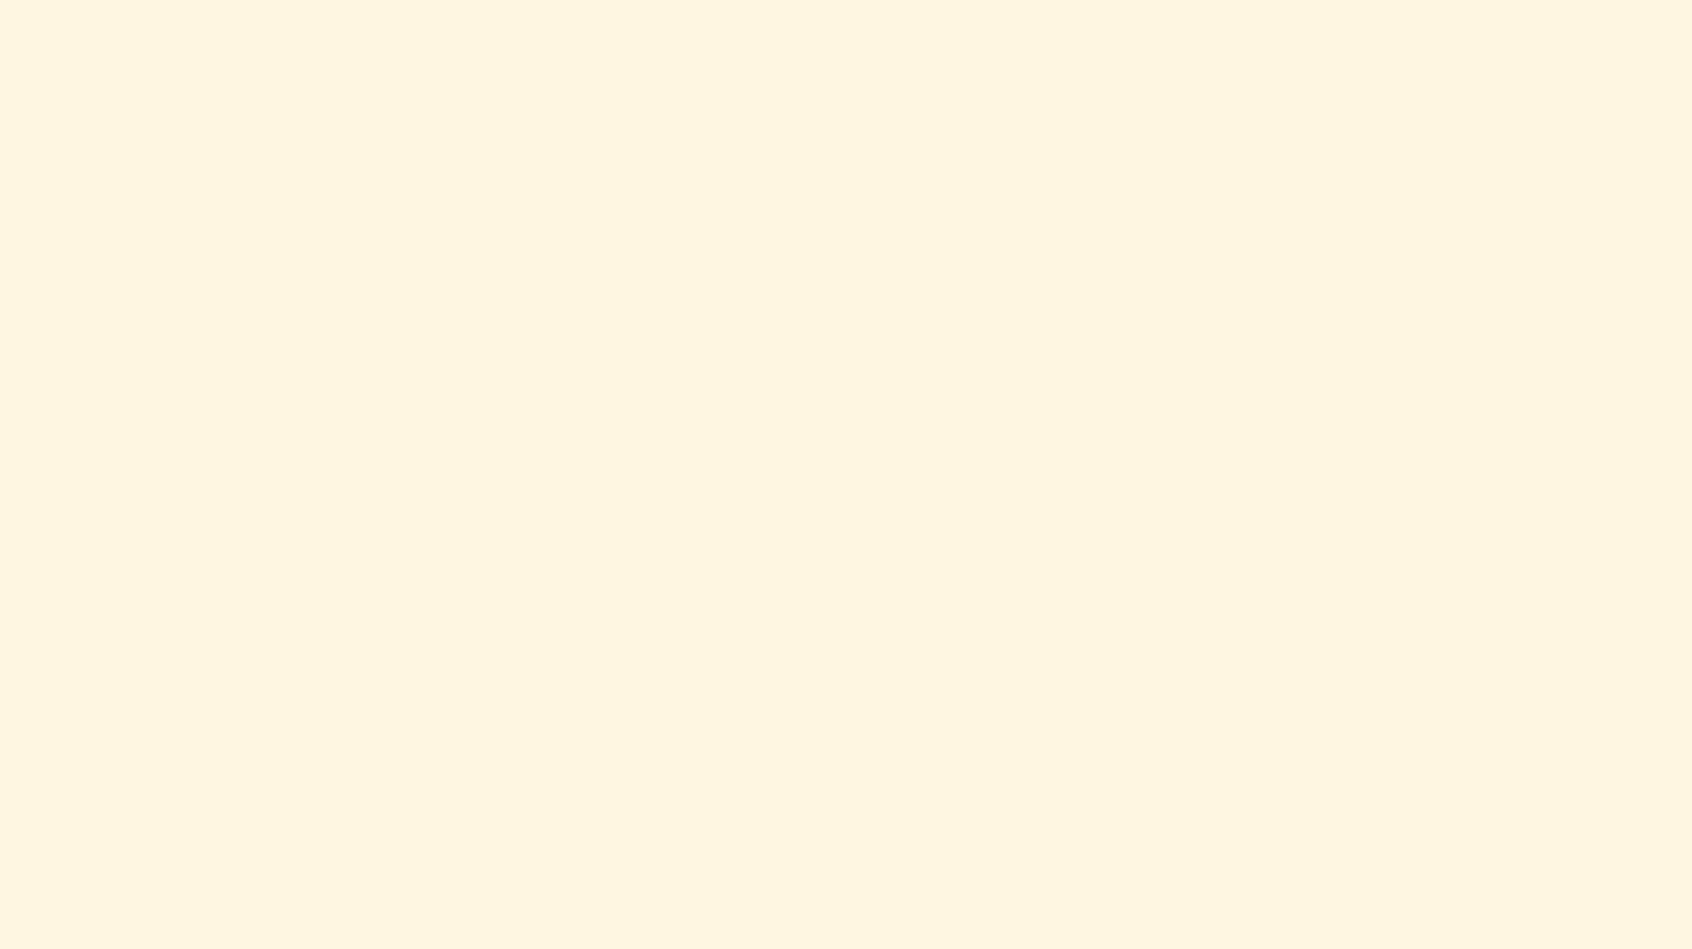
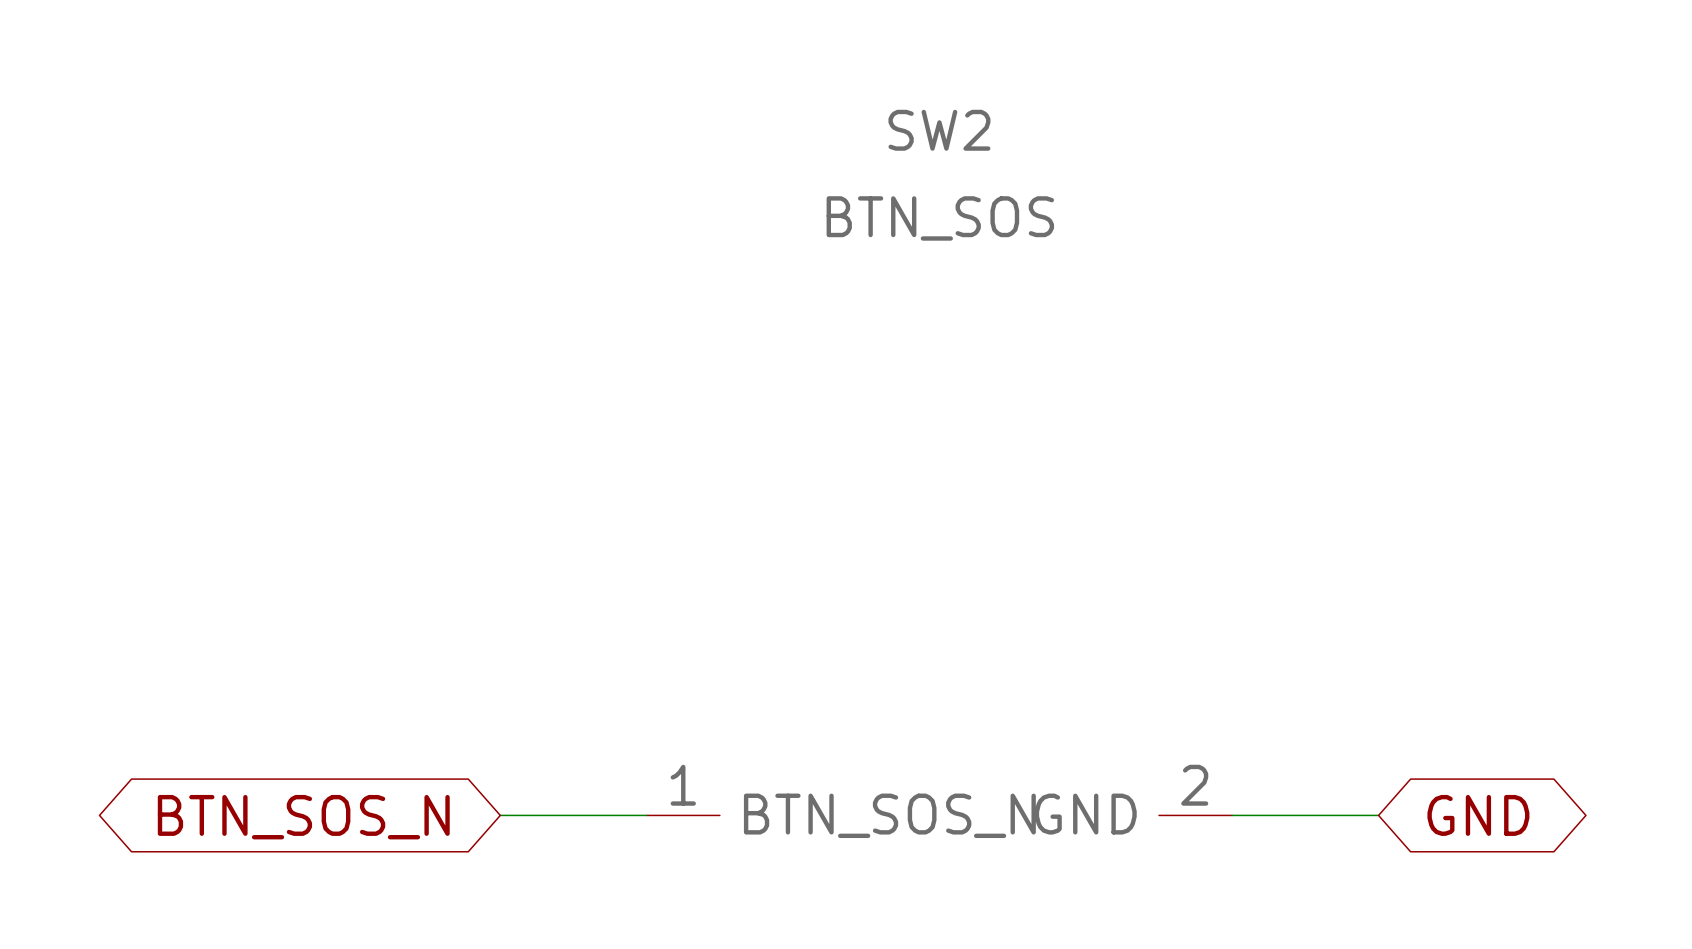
wire: none -> (500, 815) (646, 815)
SW2: none -> BTN_SOS (939, 815)
wire: none -> (1232, 815) (1378, 815)
global label: none -> GND (1478, 815)
global label: none -> BTN_SOS_N (303, 817)

